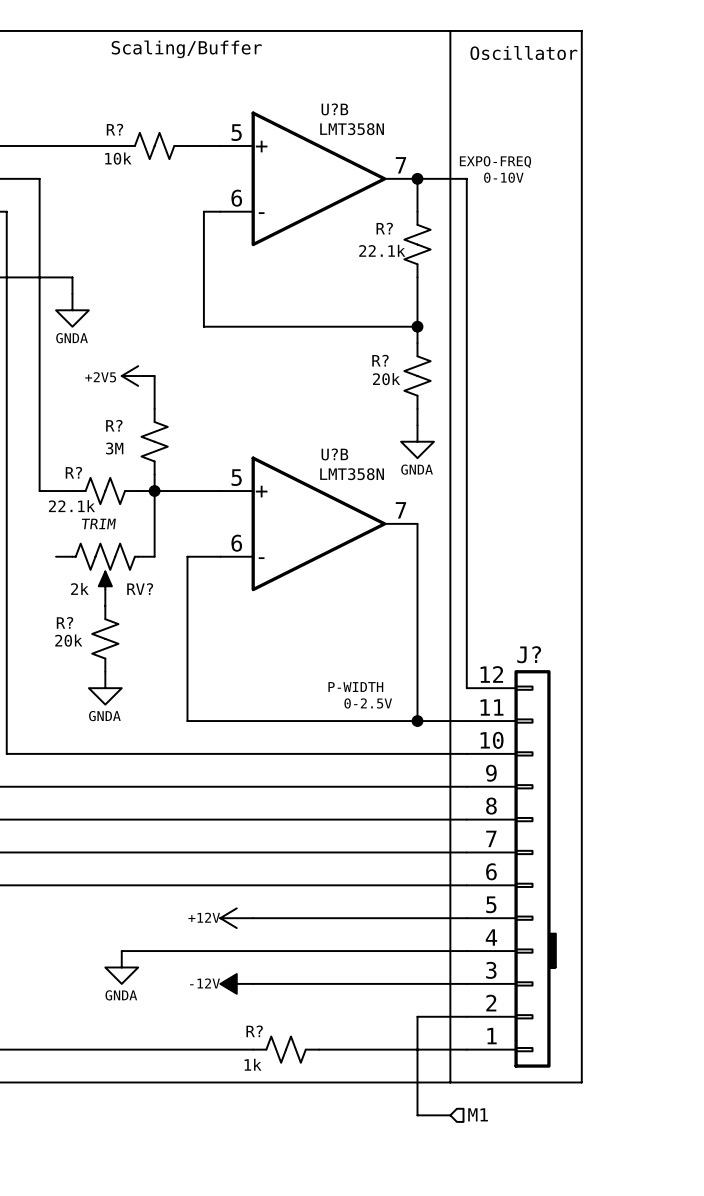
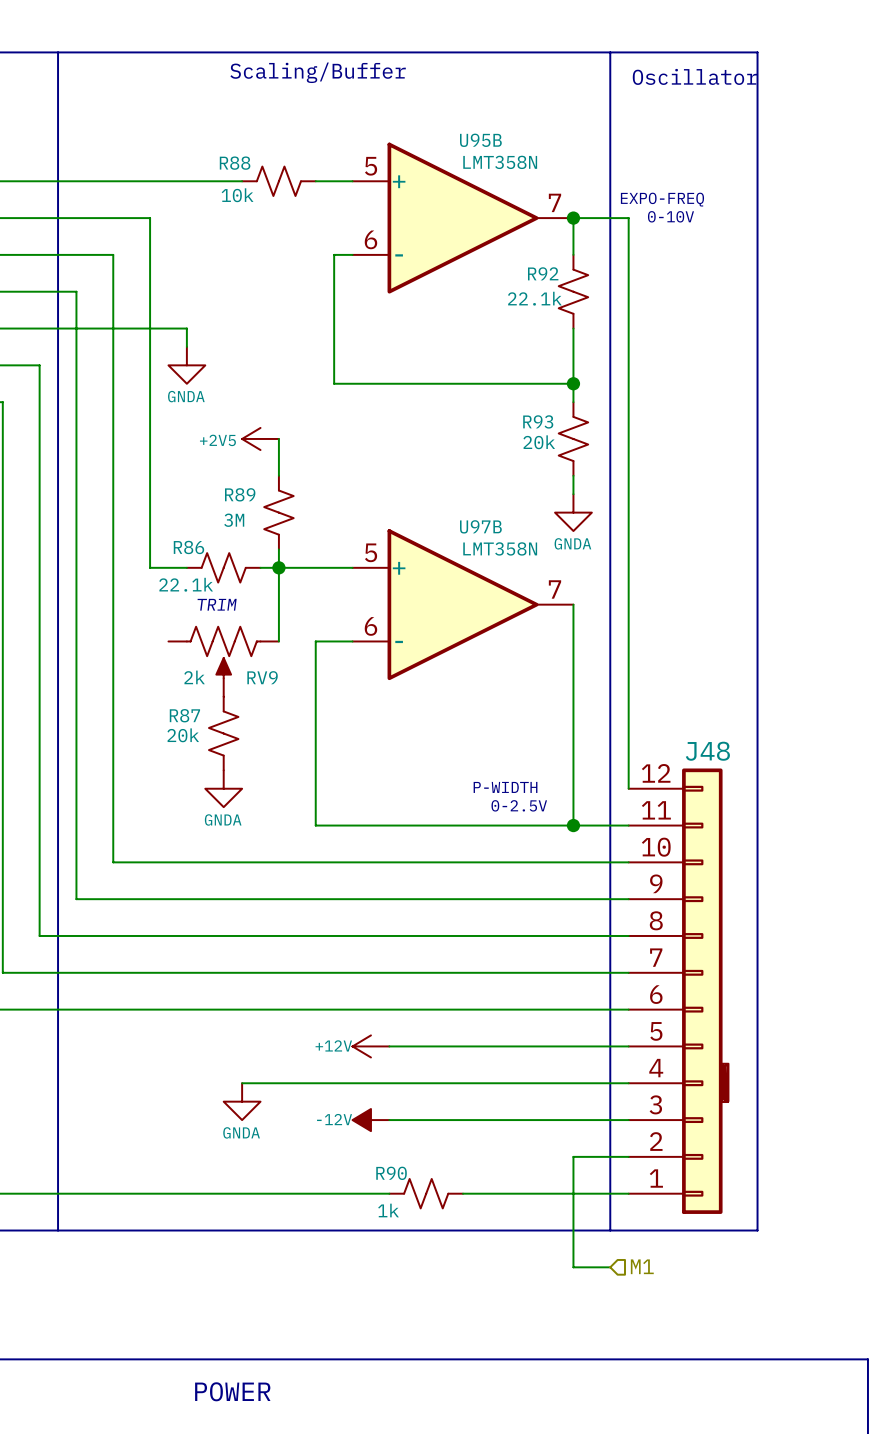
U?B name: U?B (334, 109) -> U95B (480, 140)
R? name: R? (115, 129) -> R88 (235, 163)
R? name: R? (384, 228) -> R92 (543, 273)
R? name: R? (380, 360) -> R93 (538, 421)
R? name: R? (114, 425) -> R89 (240, 494)
U?B name: U?B (334, 454) -> U97B (480, 526)
R? name: R? (73, 472) -> R86 (188, 547)
RV? name: RV? (140, 589) -> RV9 (262, 677)
R? name: R? (65, 622) -> R87 (184, 715)
J? name: J? (529, 654) -> J48 (707, 751)
R? name: R? (254, 1031) -> R90 (391, 1173)

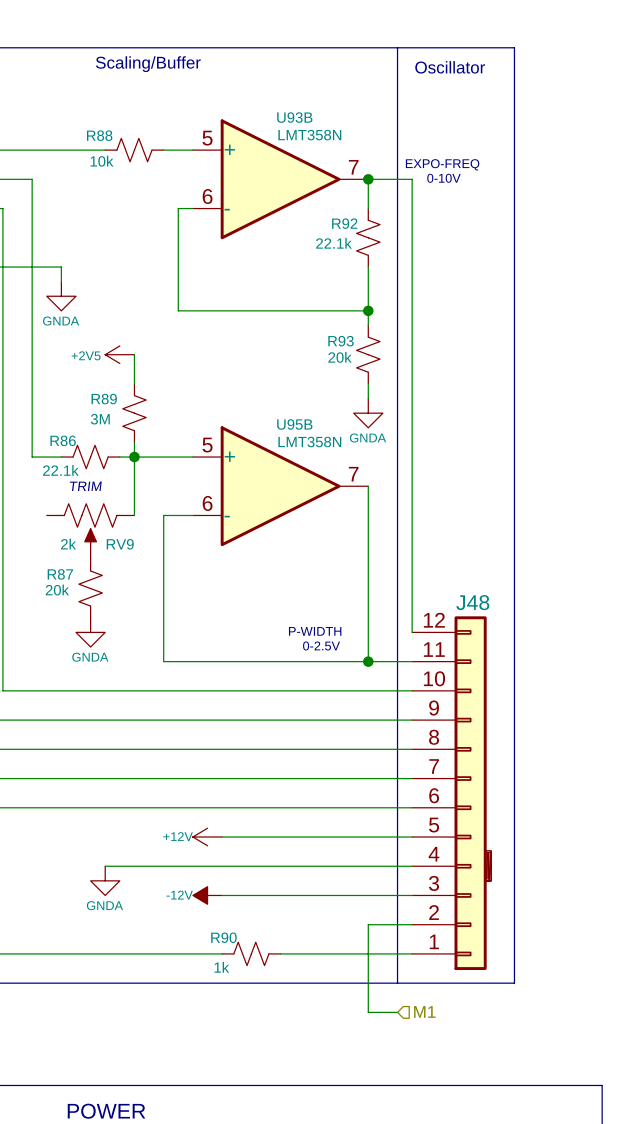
U95B name: U95B (480, 140) -> U93B (294, 117)
U97B name: U97B (480, 526) -> U95B (294, 424)

